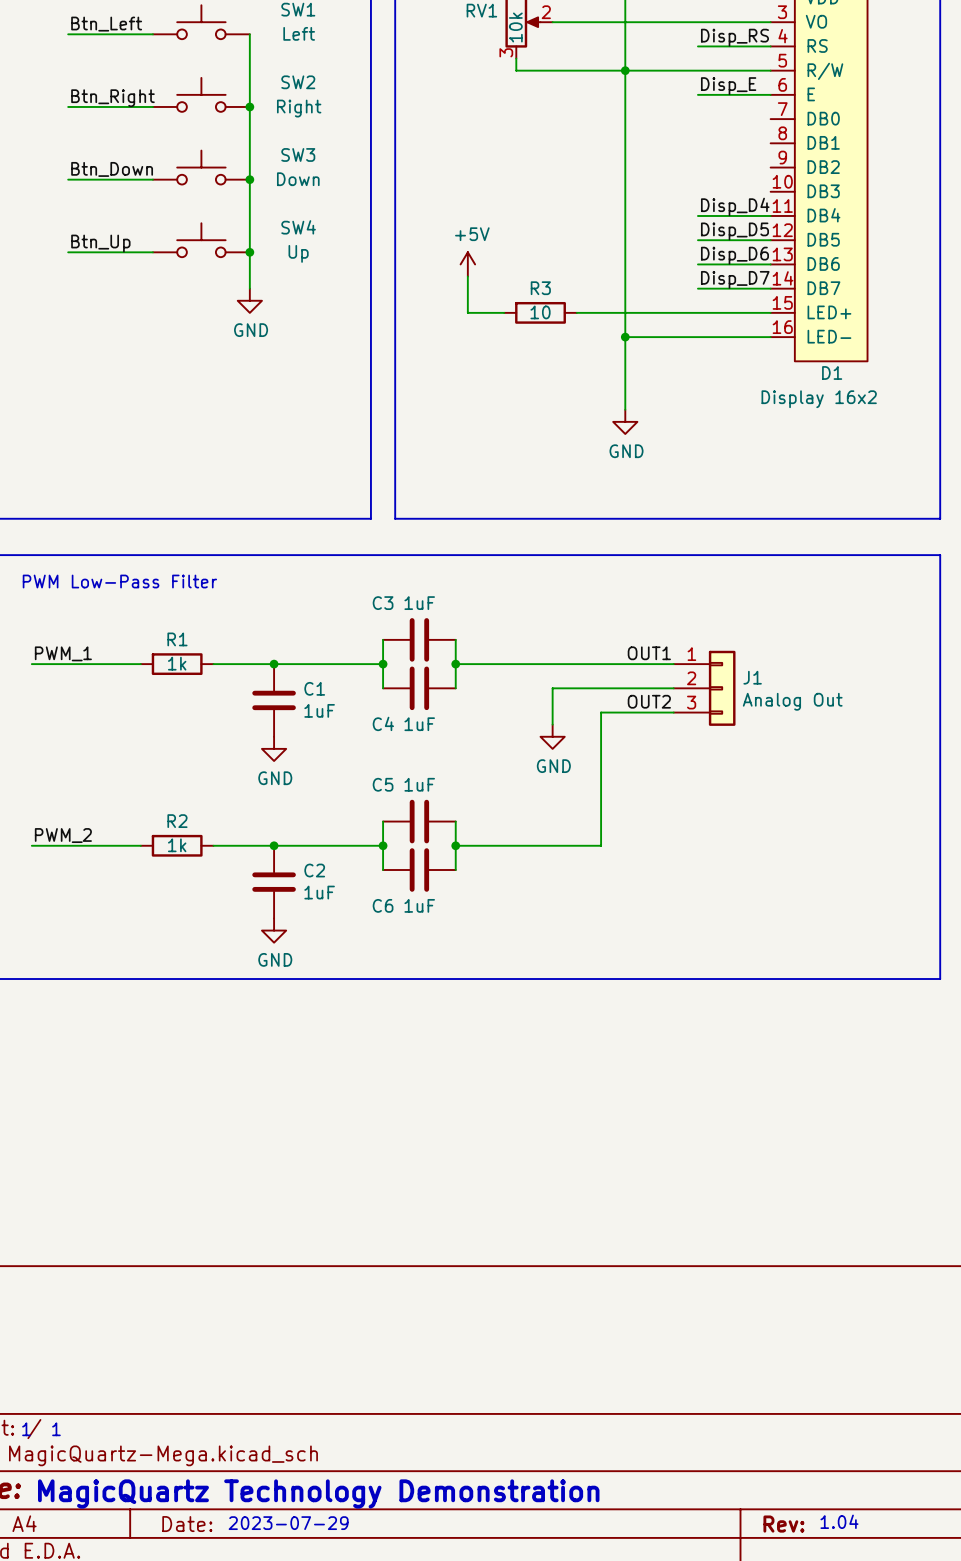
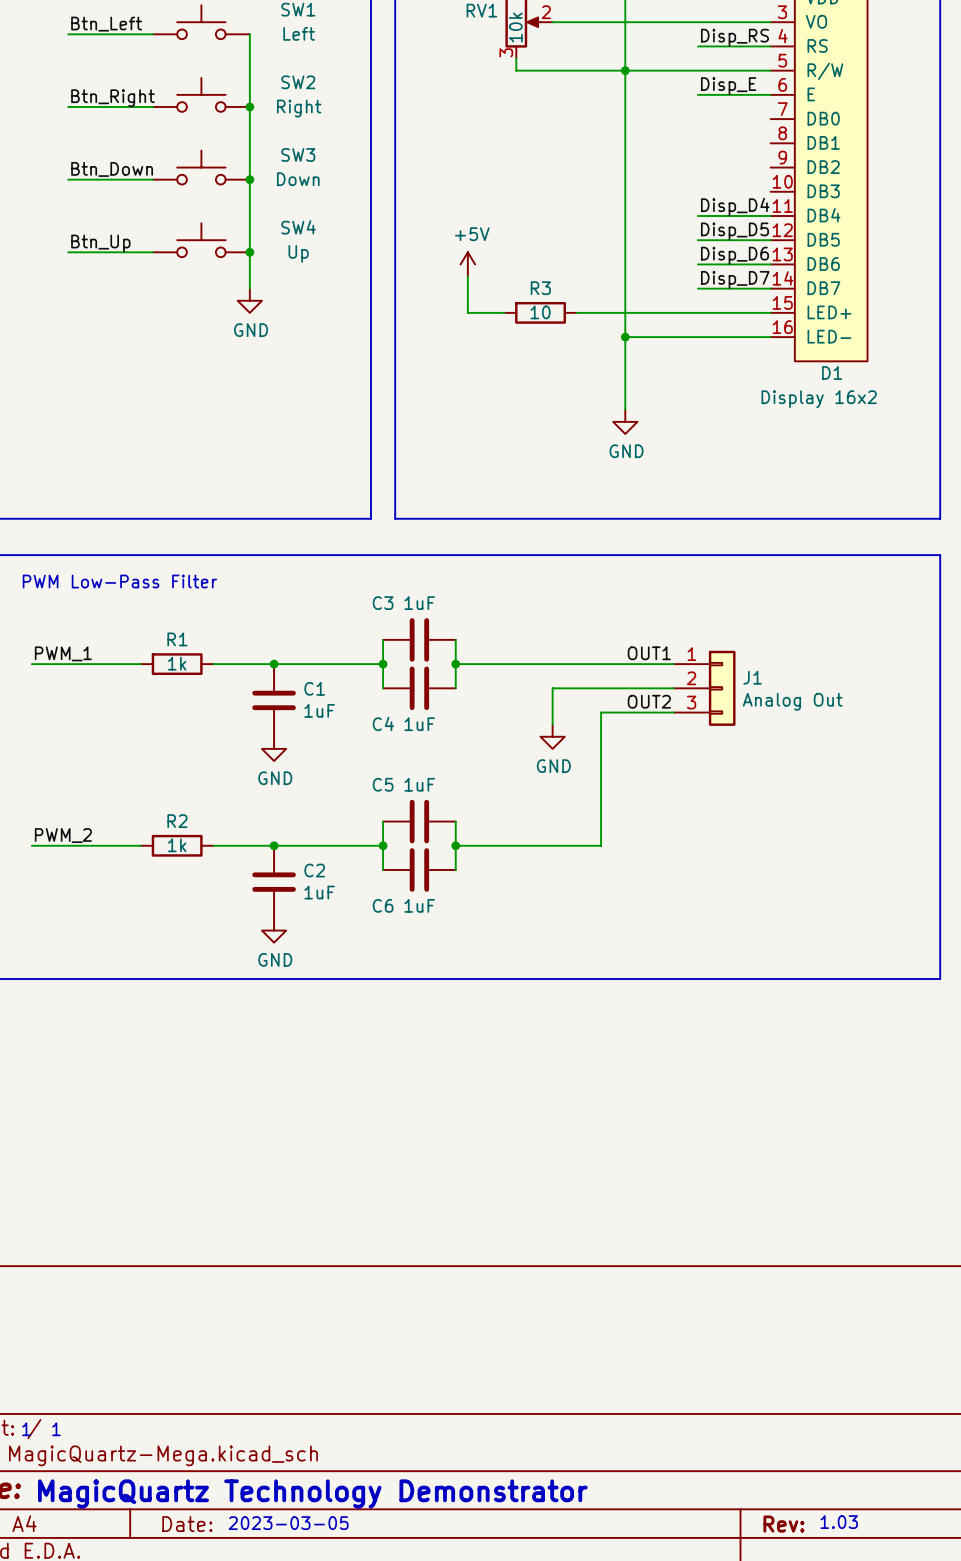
text: MagicQuartz Technology Demonstration (318, 1493) -> MagicQuartz Technology Demonstrator (312, 1493)
text: 1.04 (839, 1521) -> 1.03 (839, 1522)
text: 2023-07-29 (288, 1523) -> 2023-03-05 (288, 1523)

